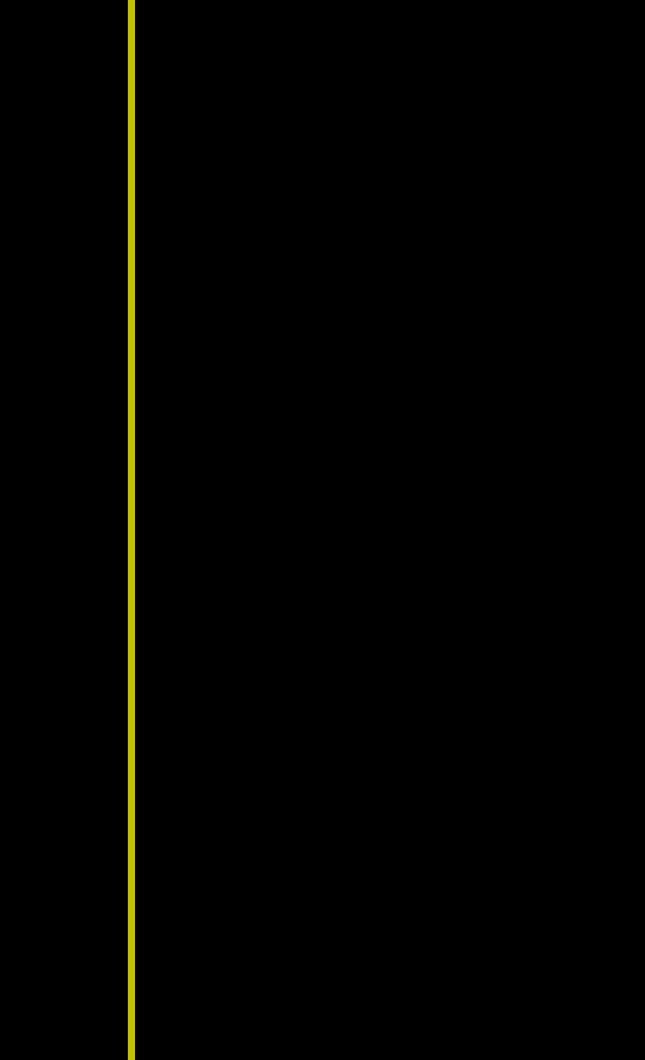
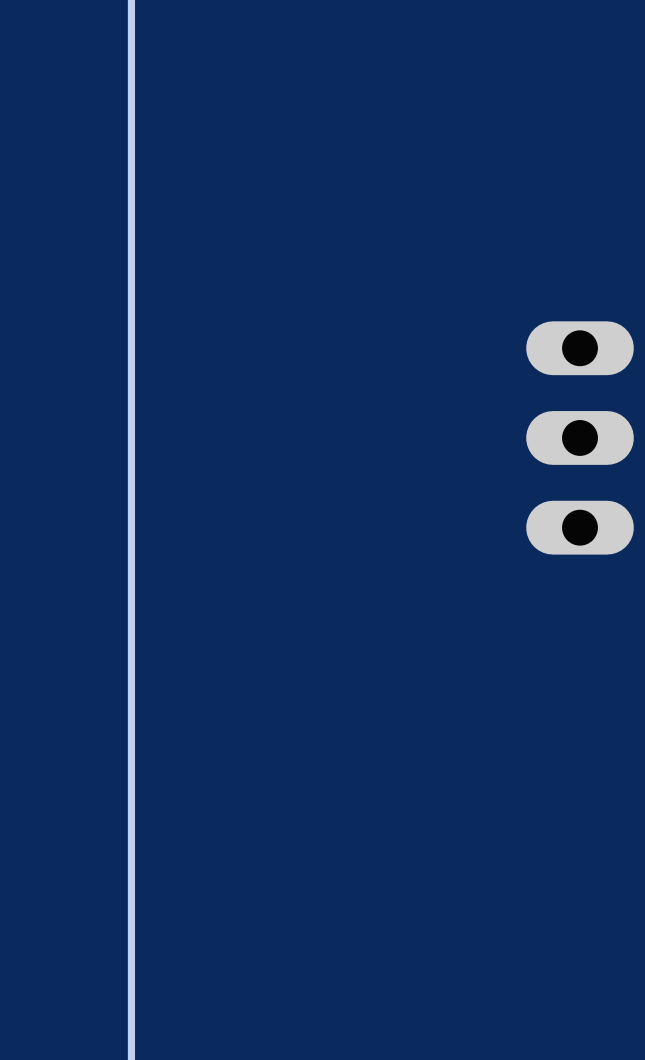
part: none -> (580, 437)

